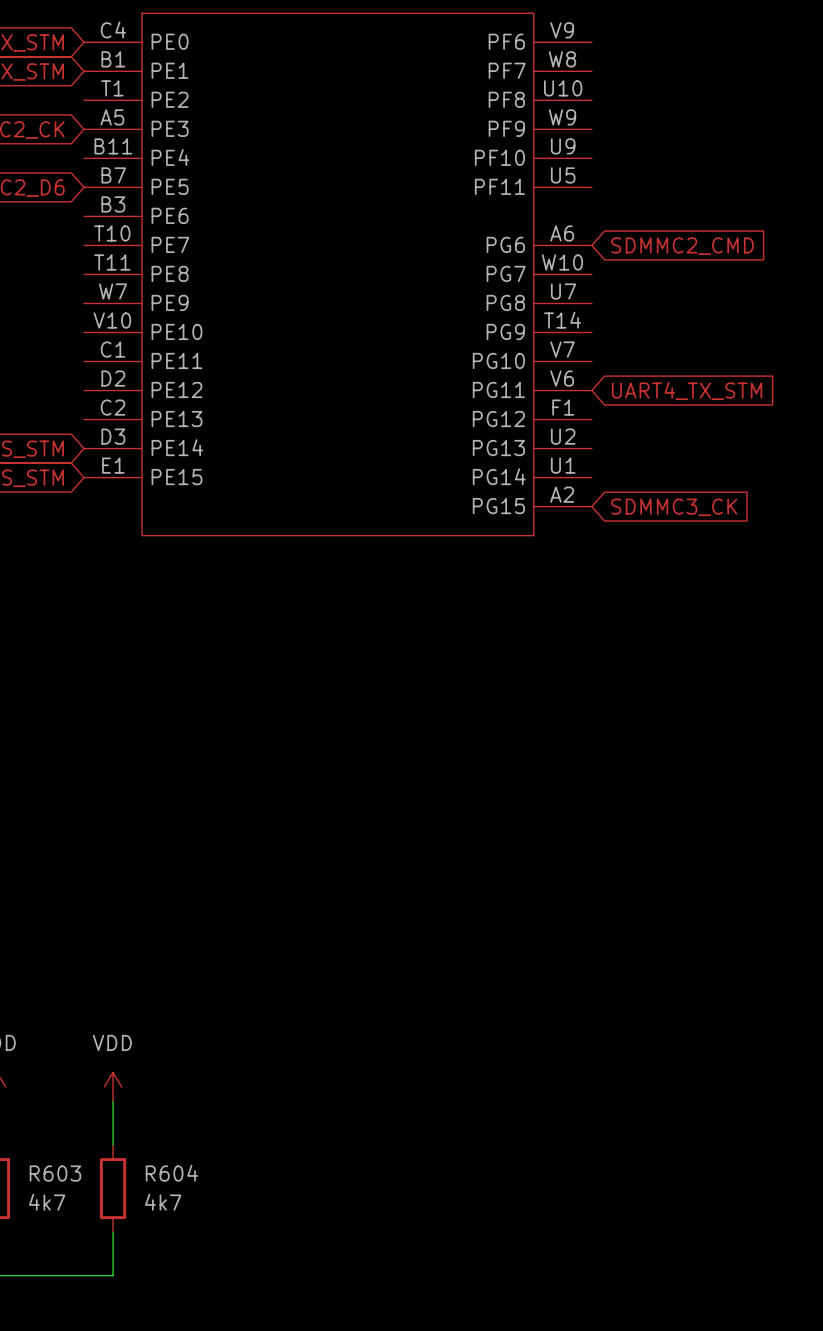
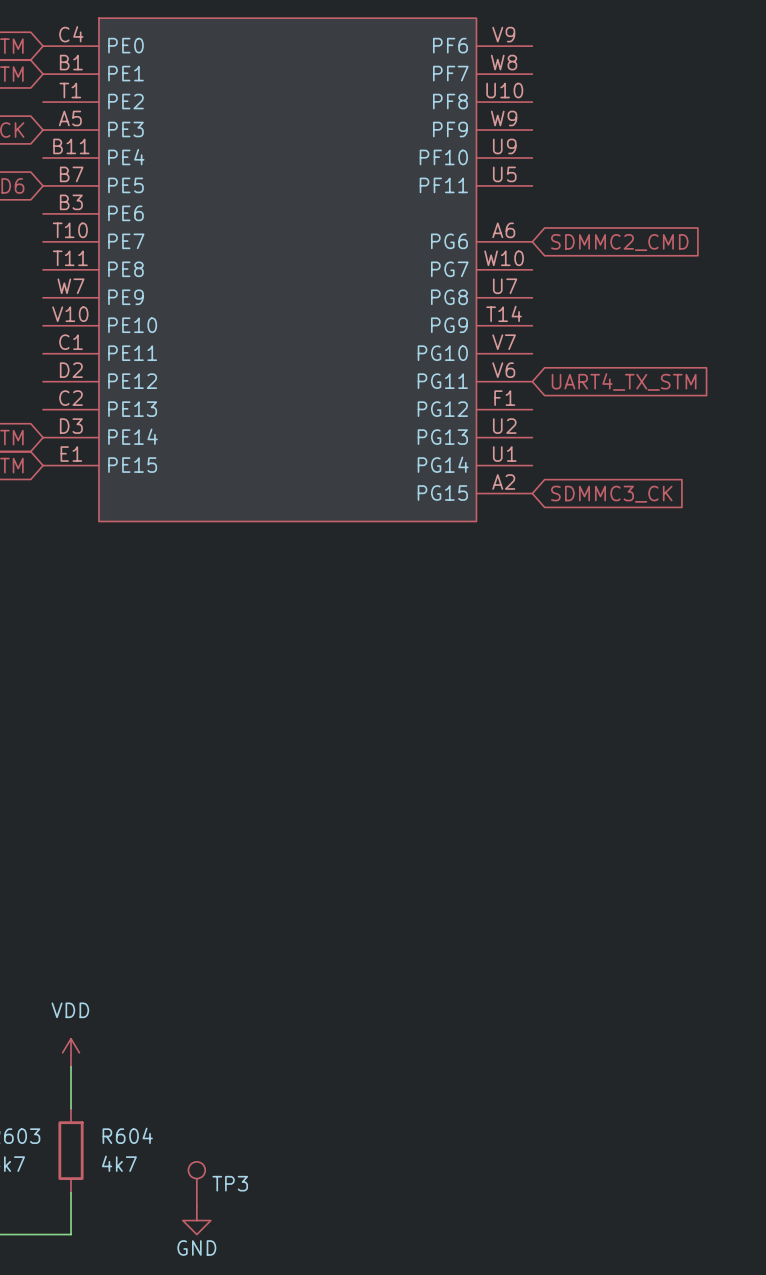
TP3: none -> (196, 1184)
power symbol: none -> GND (196, 1220)

